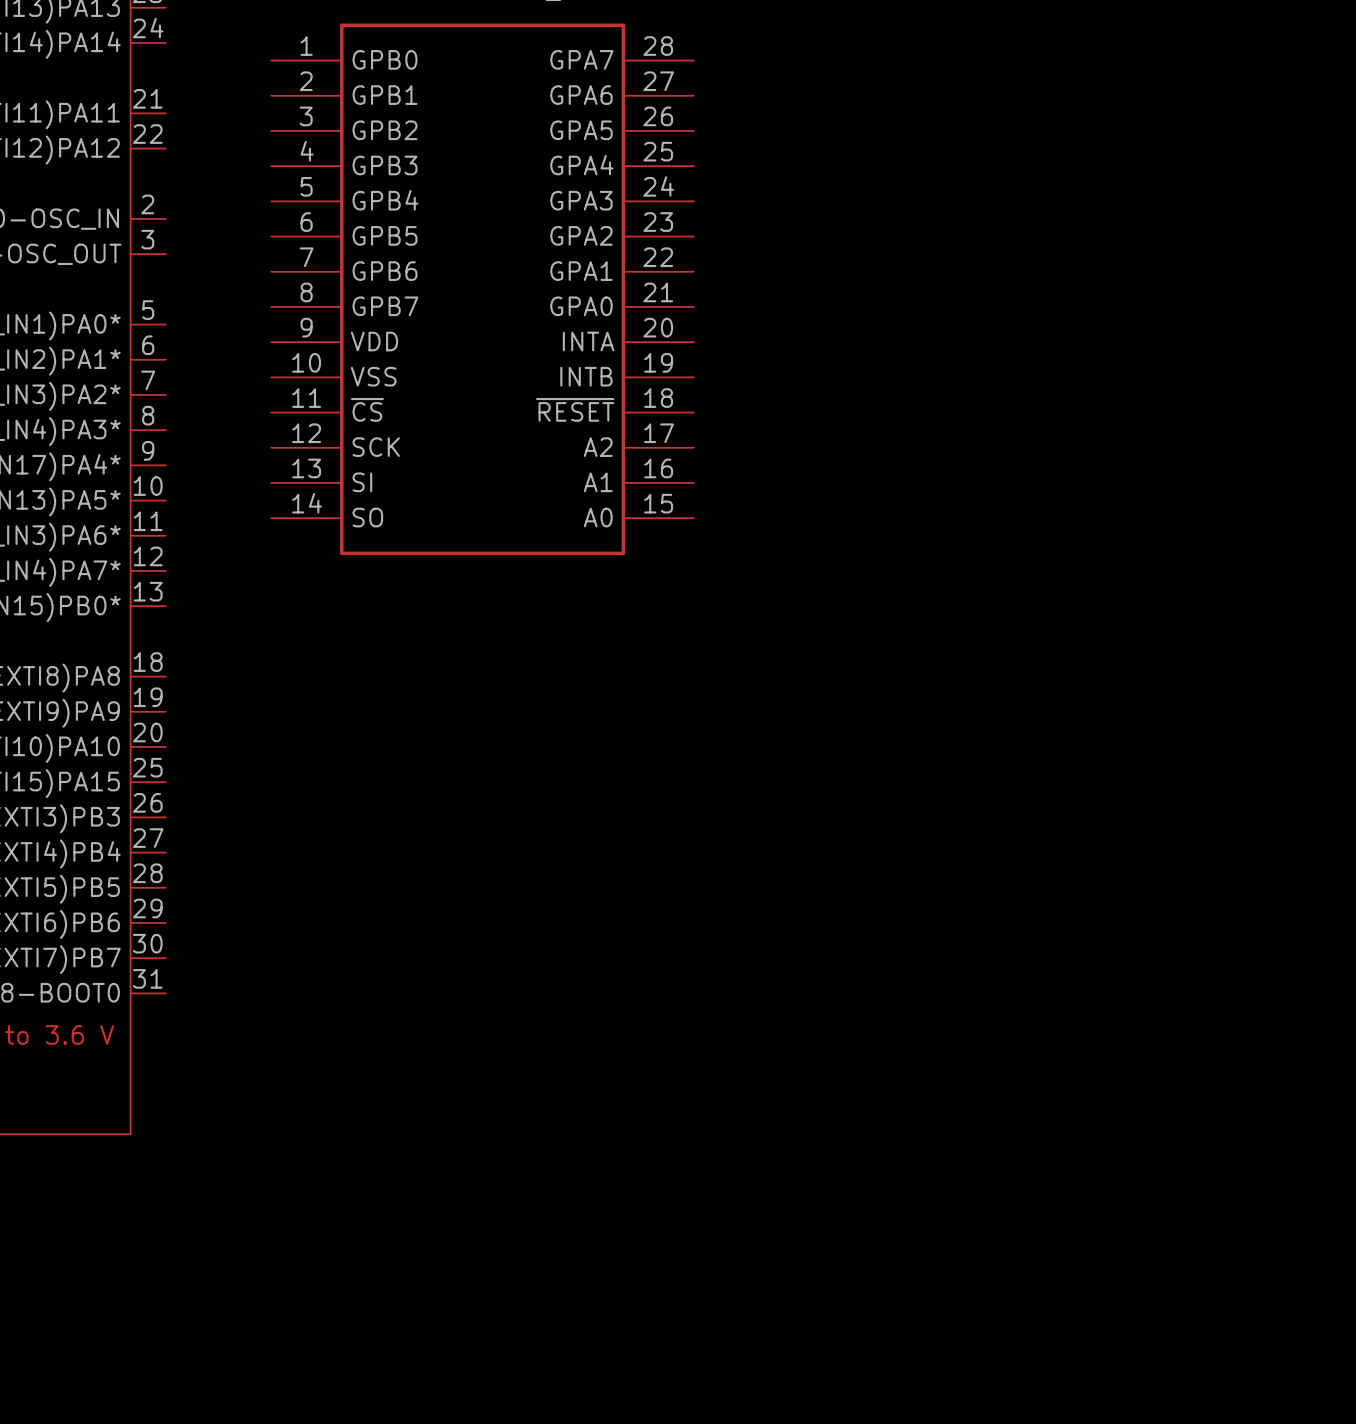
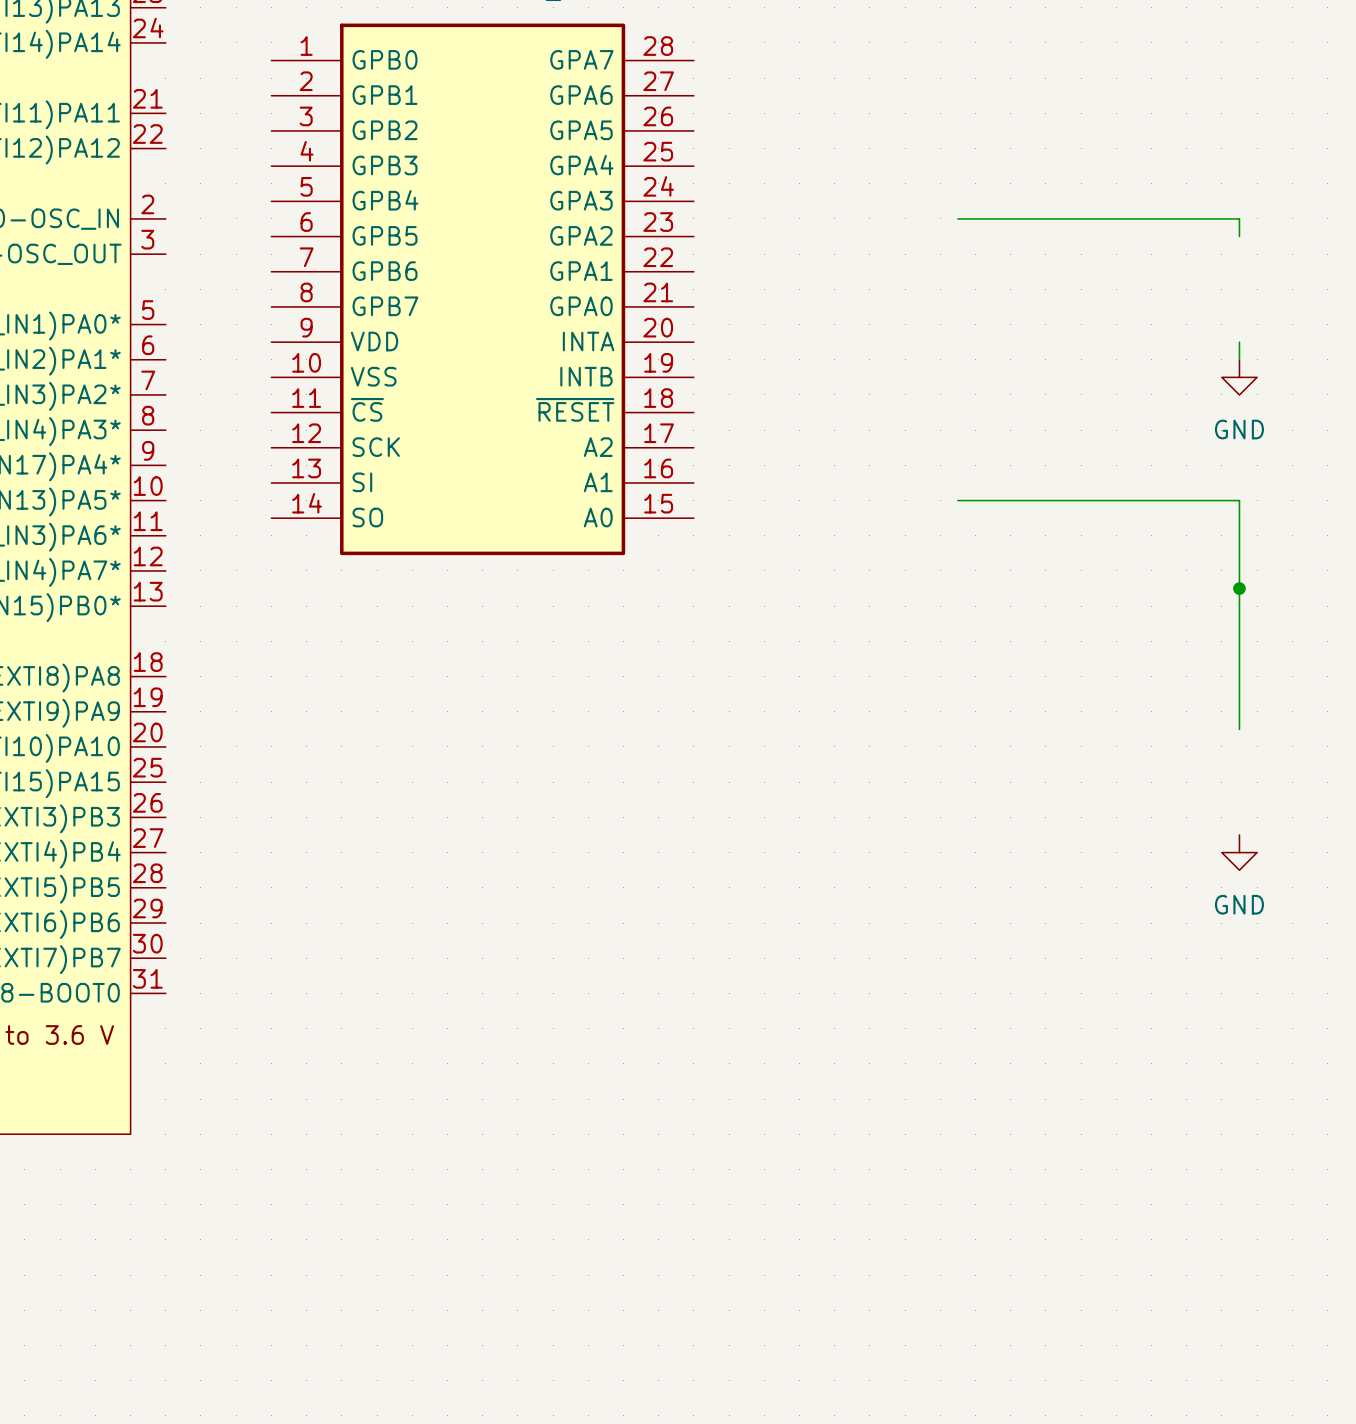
wire: none -> (957, 218) (1239, 218) (1239, 236)
wire: none -> (1239, 342) (1239, 359)
power symbol: none -> GND (1239, 377)
wire: none -> (957, 500) (1239, 500) (1239, 729)
junction: none -> (1239, 588)
power symbol: none -> GND (1239, 852)

